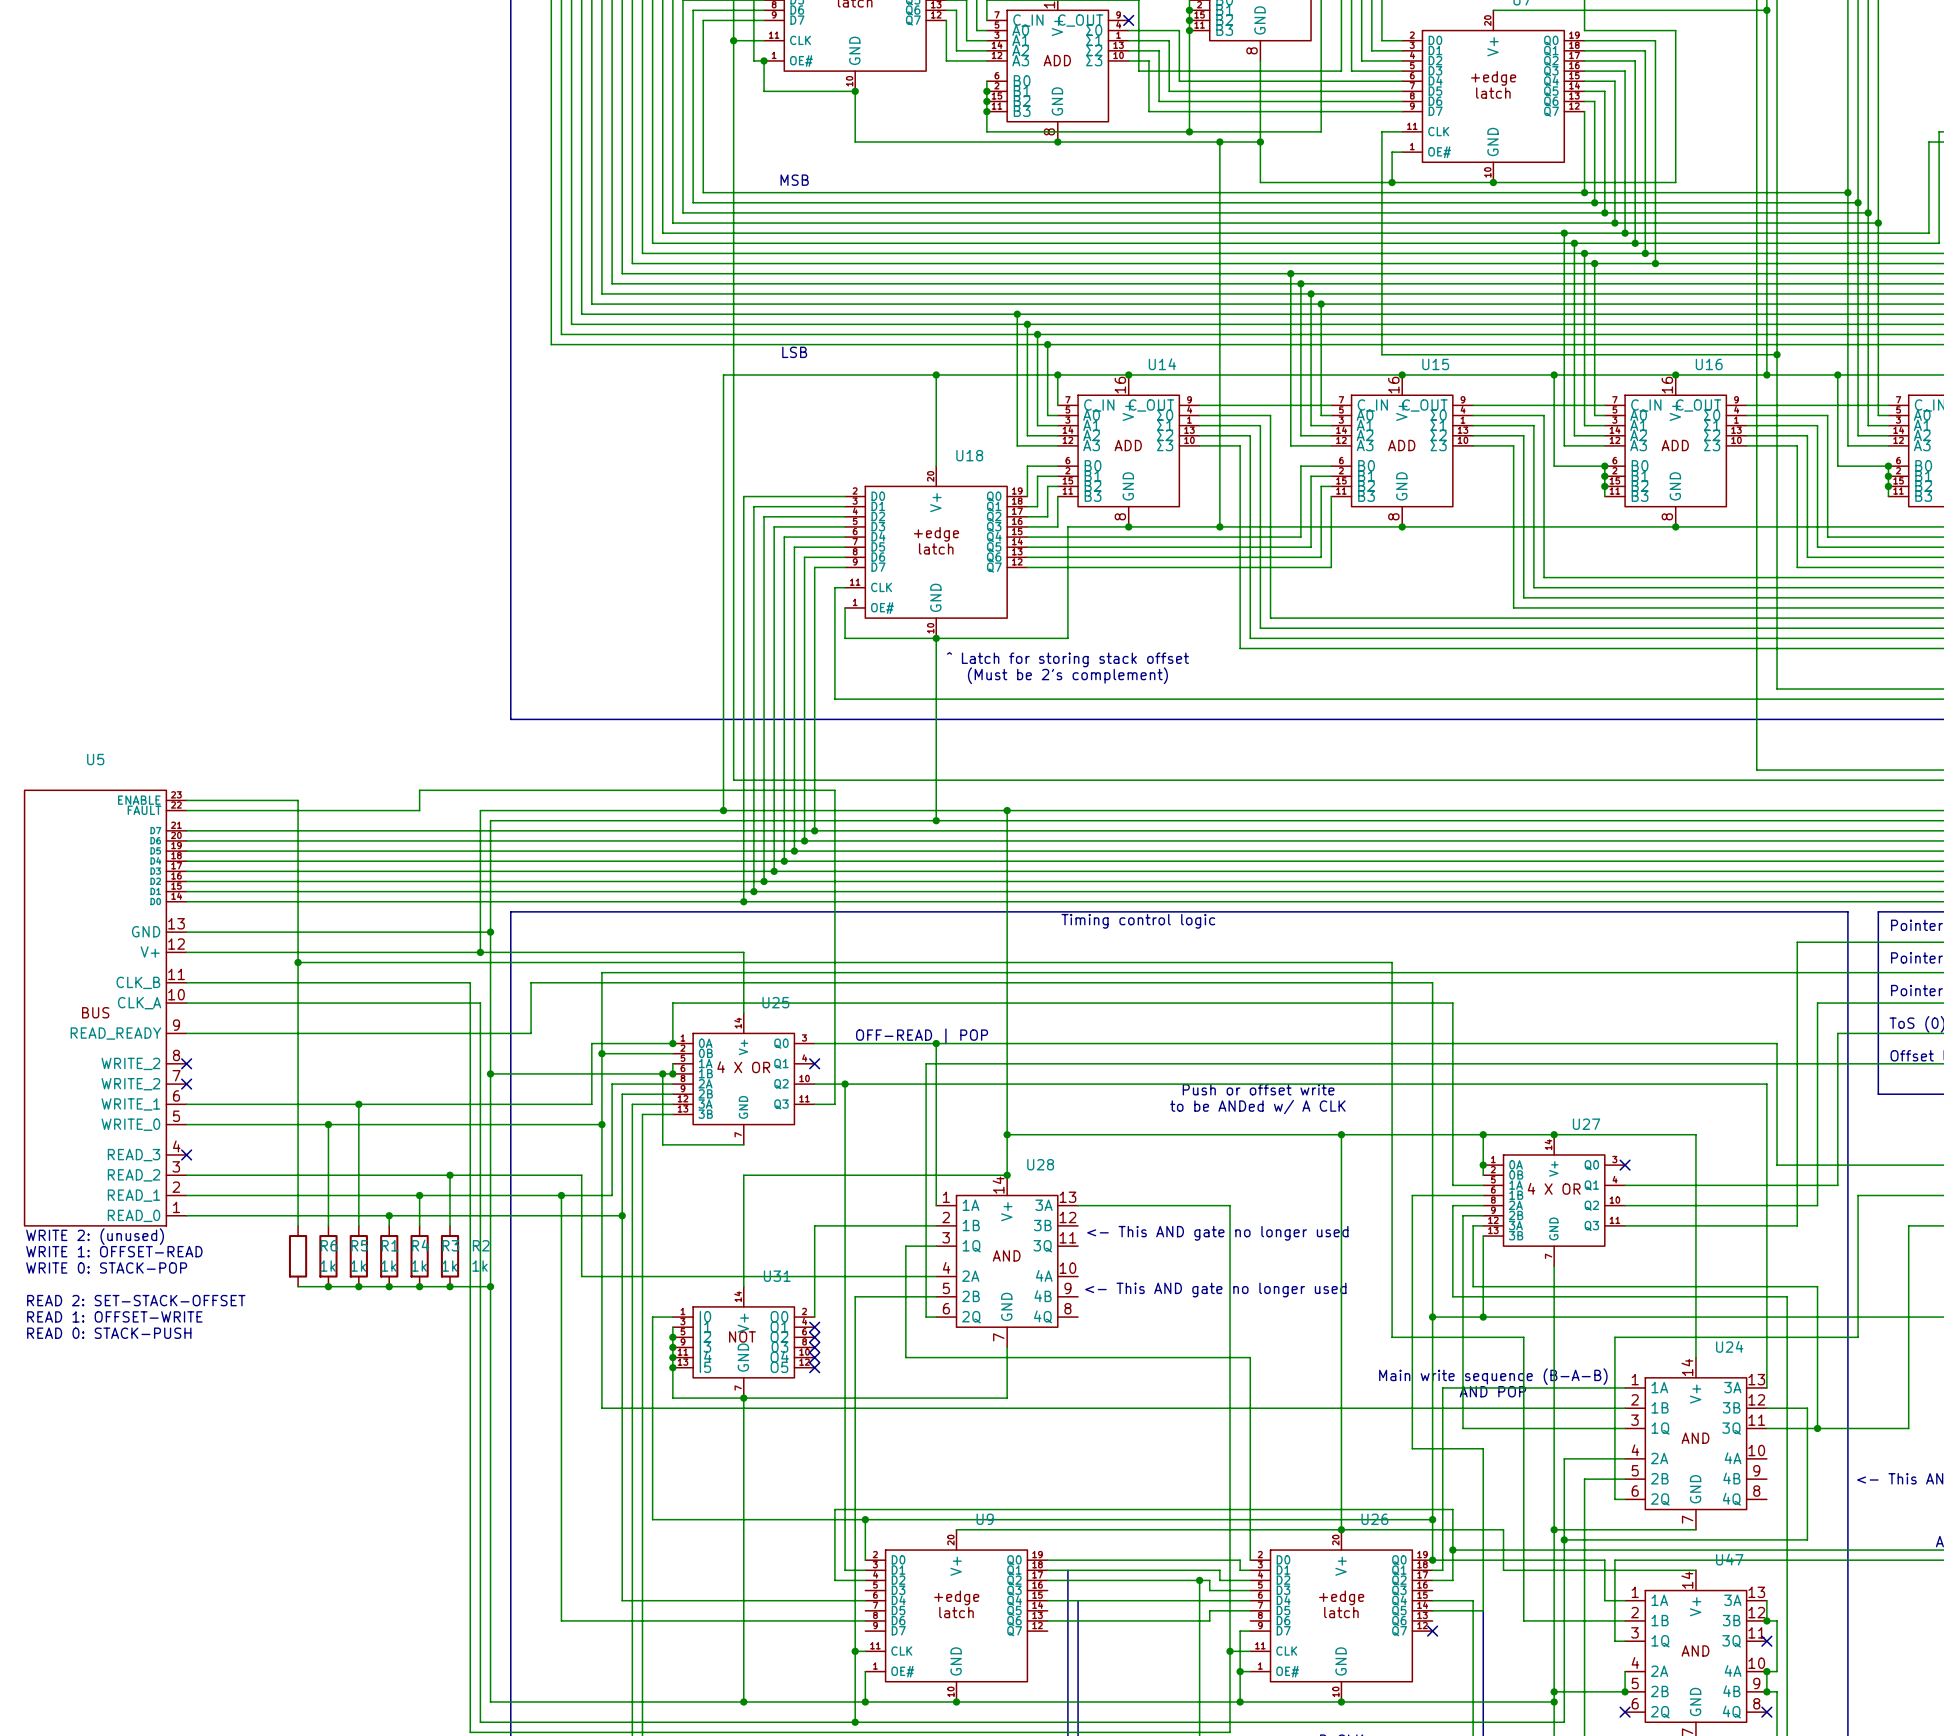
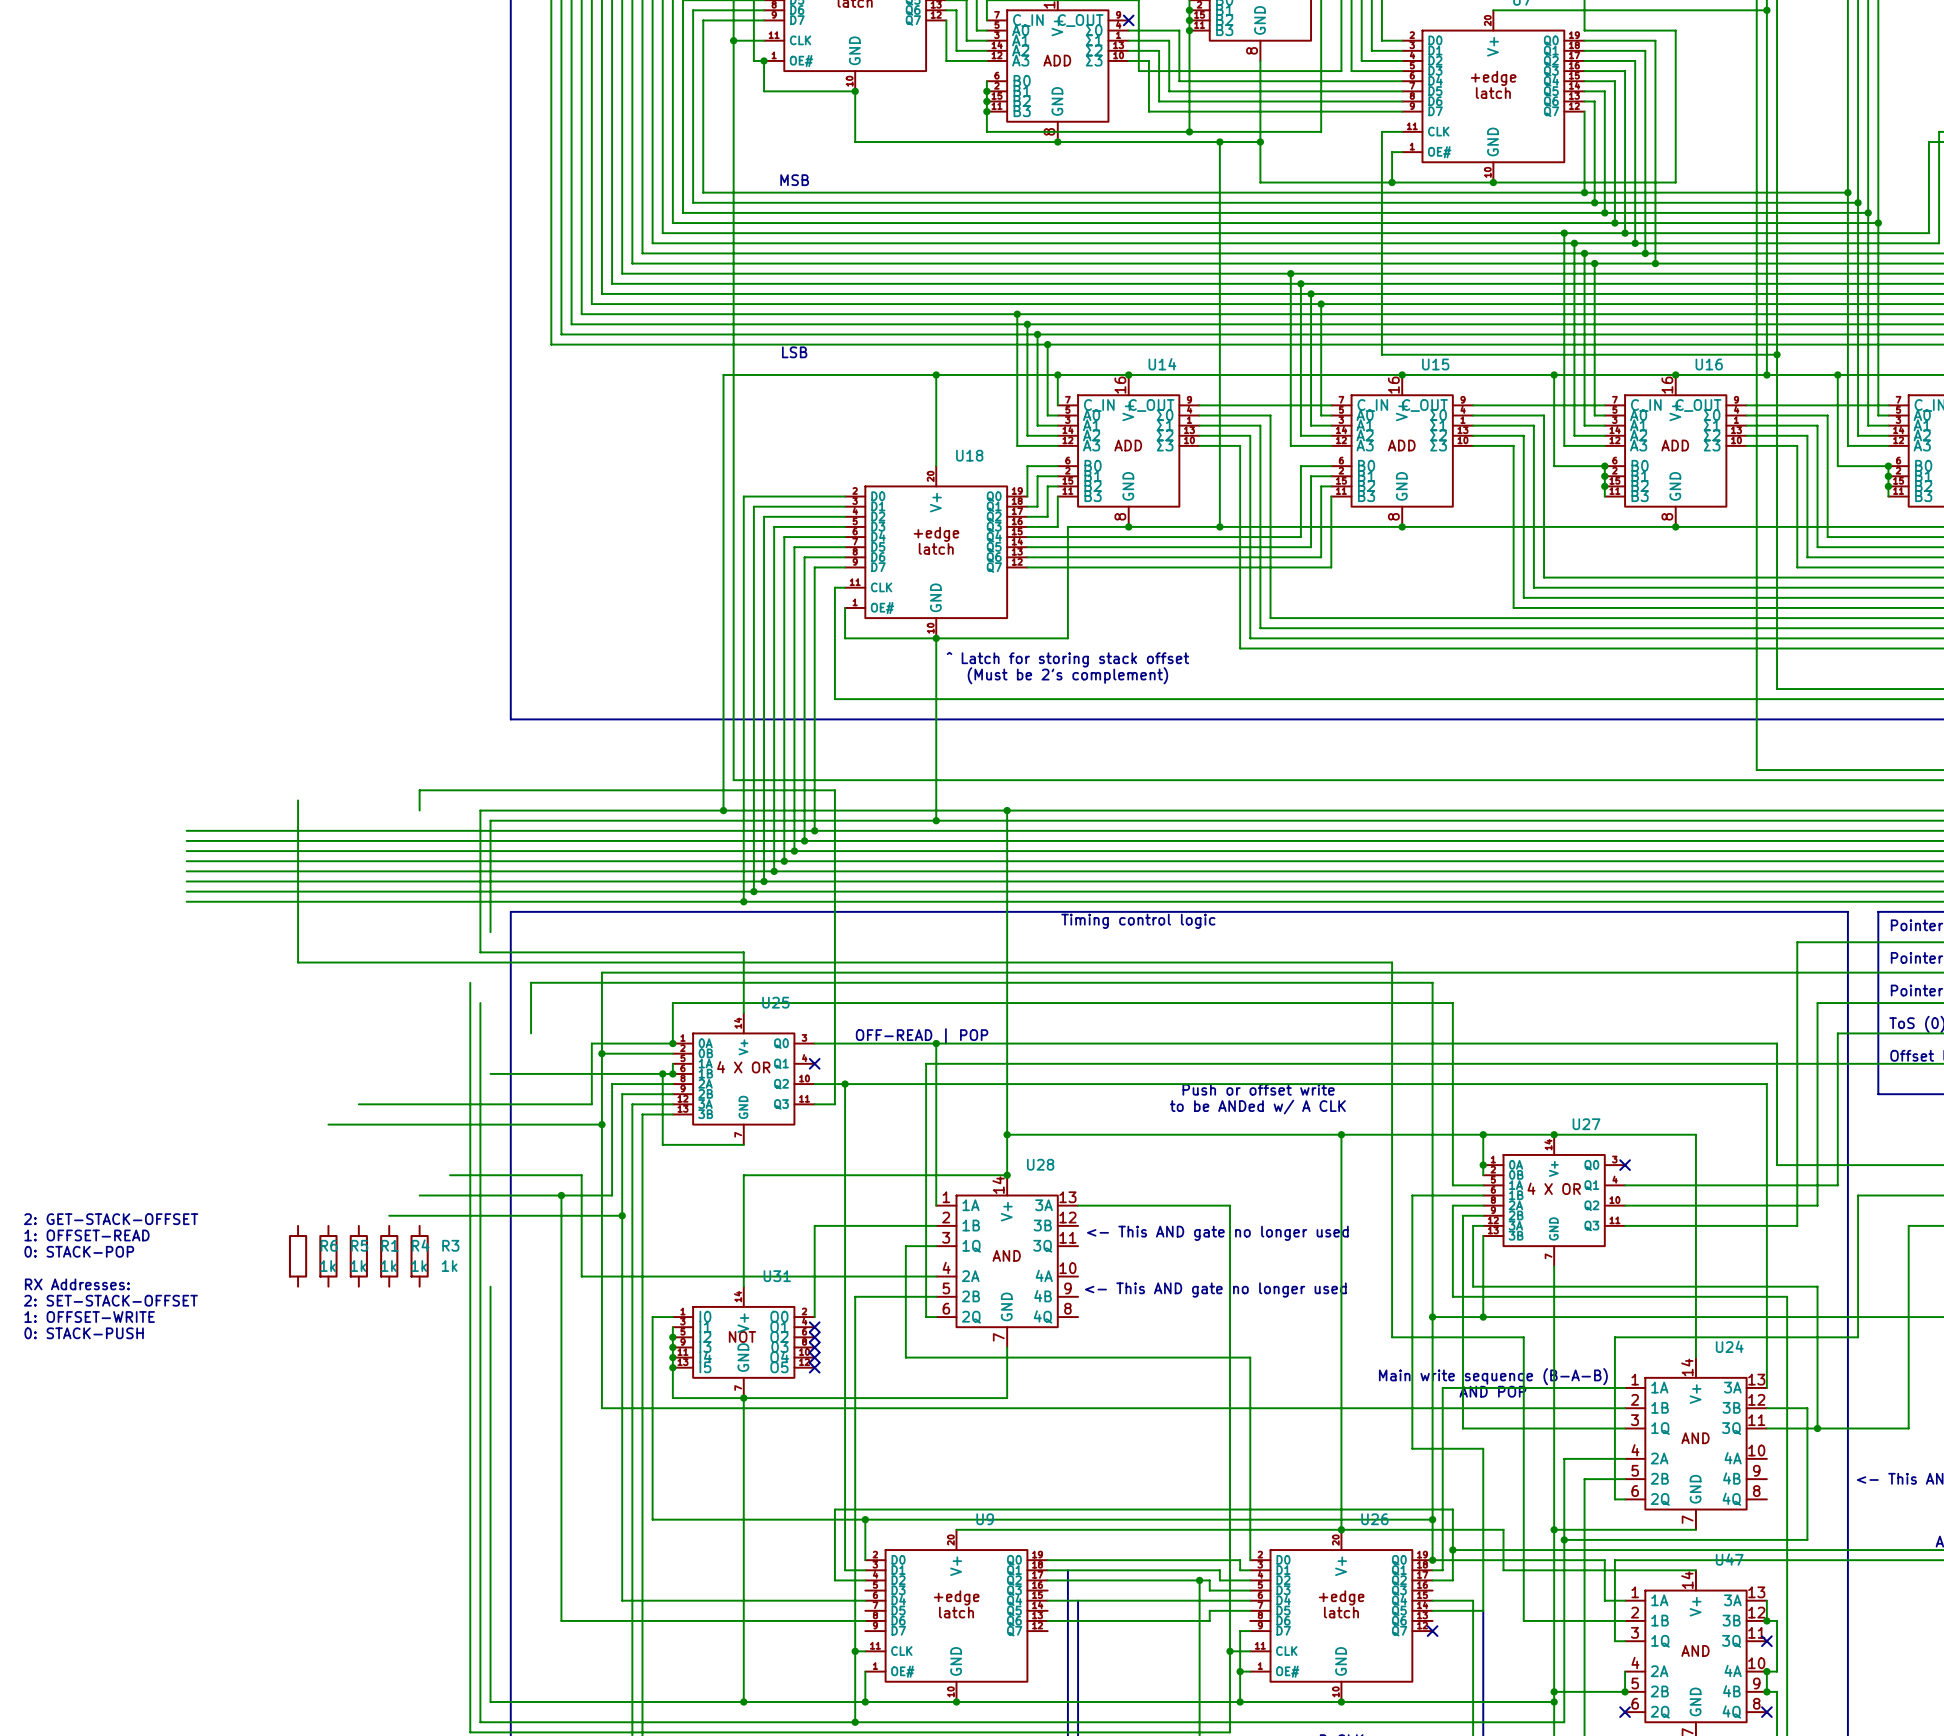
wire: (186, 800) (298, 800) -> none
wire: (186, 810) (419, 810) -> none
wire: (186, 932) (490, 932) (490, 1286) (298, 1286) -> none
junction: (490, 932) -> none
wire: (186, 952) (480, 952) -> none
junction: (480, 952) -> none
wire: (298, 962) (298, 1225) -> none
junction: (298, 962) -> none
wire: (186, 982) (470, 982) -> none
wire: (186, 1003) (480, 1003) -> none
U5: (105, 1008) -> none
wire: (186, 1033) (531, 1033) -> none
no-connect mark: (186, 1063) -> none
junction: (490, 1073) -> none
no-connect mark: (186, 1084) -> none
wire: (186, 1104) (358, 1104) (358, 1225) -> none
junction: (358, 1104) -> none
wire: (186, 1124) (328, 1124) (328, 1225) -> none
junction: (328, 1124) -> none
no-connect mark: (186, 1154) -> none
wire: (186, 1175) (450, 1175) (450, 1225) -> none
junction: (450, 1175) -> none
wire: (186, 1195) (419, 1195) (419, 1225) -> none
junction: (419, 1195) -> none
wire: (186, 1215) (389, 1215) (389, 1225) -> none
junction: (389, 1215) -> none
text: none -> 2: GET-STACK-OFFSET (111, 1219)
text: WRITE 2: (unused) (95, 1236) -> 1: OFFSET-READ (87, 1235)
text: WRITE 1: OFFSET-READ (114, 1251) -> 0: STACK-POP (79, 1251)
R2: 1k (450, 1256) -> none
text: WRITE 0: STACK-POP (106, 1267) -> none
text: none -> RX Addresses: (77, 1284)
junction: (328, 1286) -> none
junction: (358, 1286) -> none
junction: (389, 1286) -> none
junction: (419, 1286) -> none
junction: (450, 1286) -> none
junction: (490, 1286) -> none
text: READ 2: SET-STACK-OFFSET (136, 1300) -> 2: SET-STACK-OFFSET (110, 1300)
text: READ 1: OFFSET-WRITE (114, 1316) -> 1: OFFSET-WRITE (89, 1317)
text: READ 0: STACK-PUSH (109, 1333) -> 0: STACK-PUSH (84, 1333)

